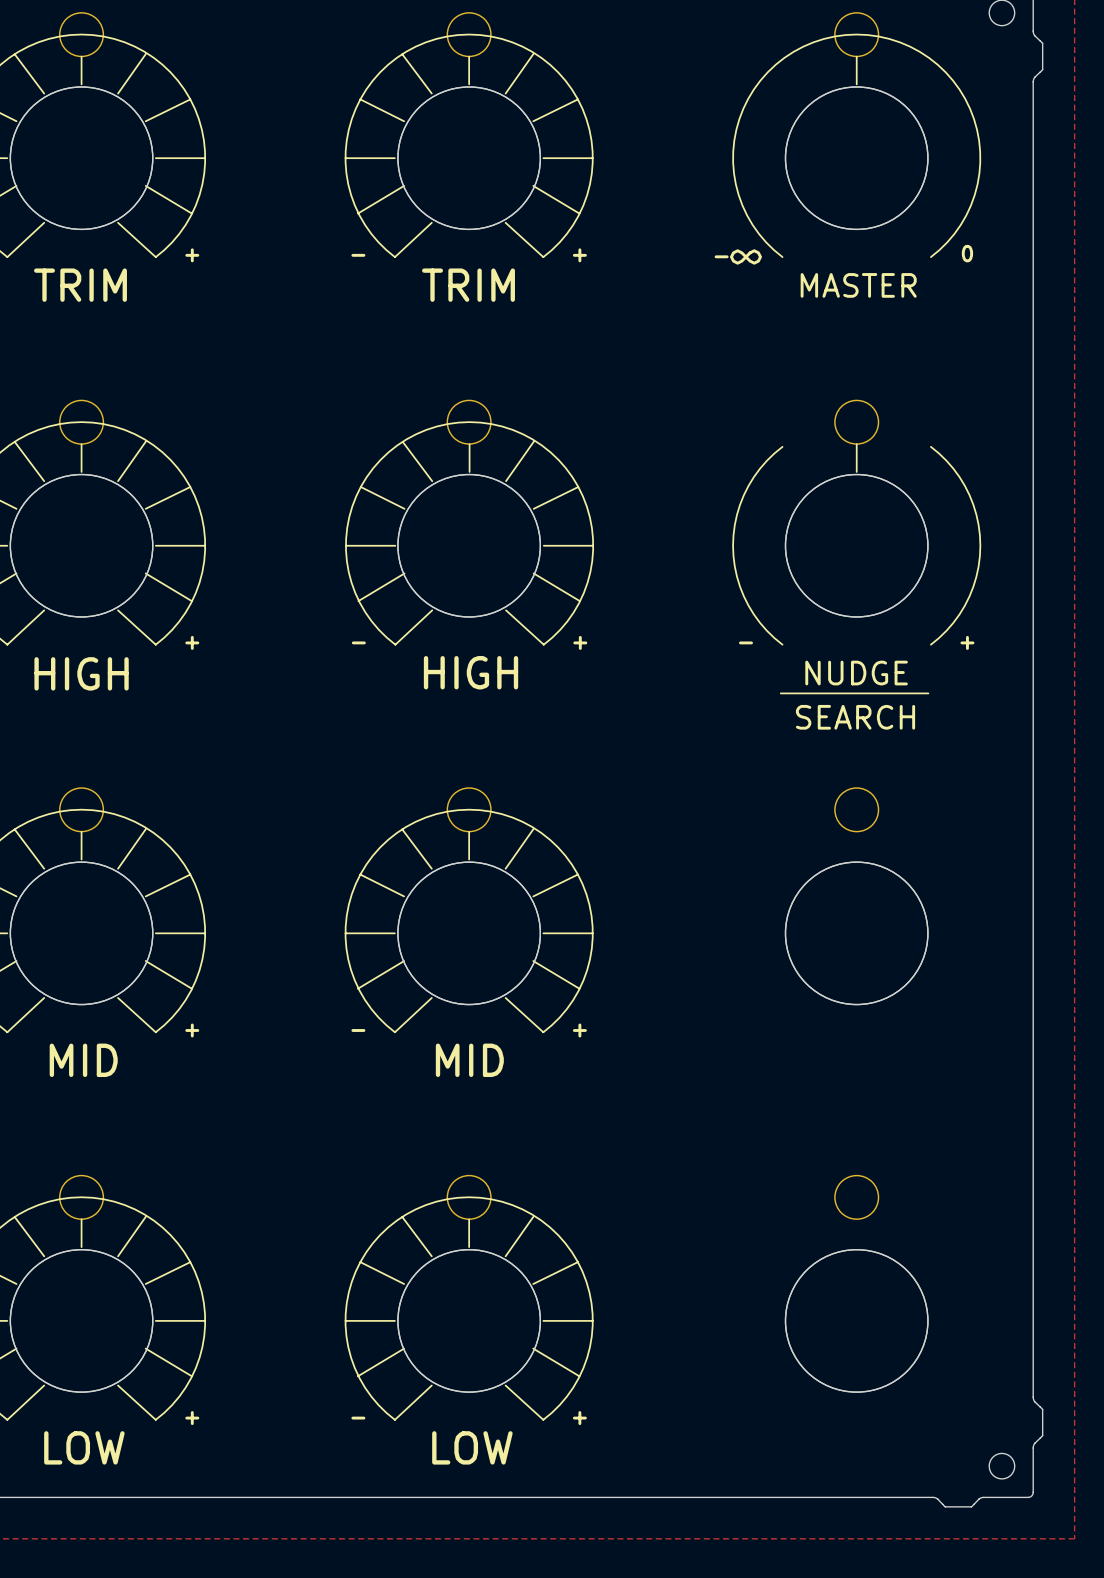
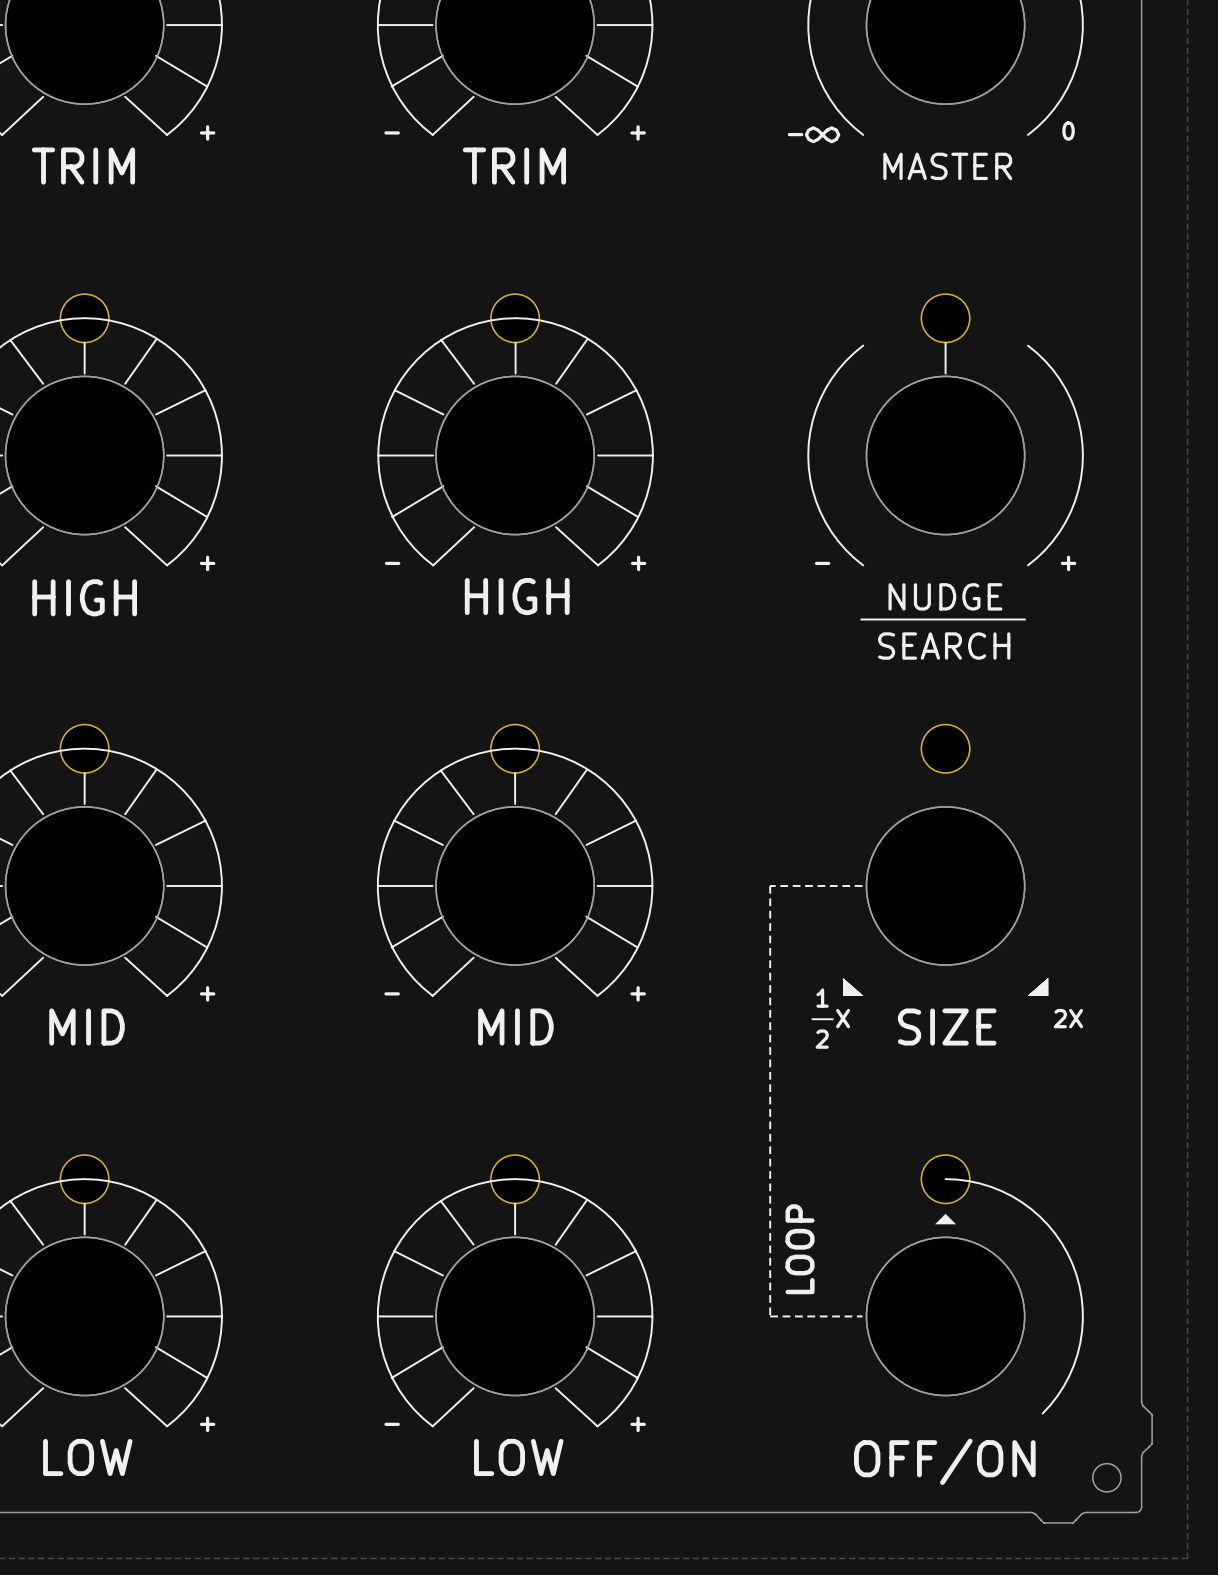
line: none -> (862, 885) (770, 885) (770, 1316) (862, 1316)
drawing: none -> [843, 978, 864, 996]
drawing: none -> [1027, 978, 1049, 996]
text: none -> 1 (822, 998)
text: none -> X (843, 1018)
text: none -> 2X (1068, 1018)
line: none -> (812, 1019) (832, 1019)
text: none -> SIZE (947, 1026)
text: none -> 2 (822, 1039)
line: none -> (945, 1179) (968, 1181) (990, 1186) (1021, 1202) (1047, 1224) (1061, 1243) (1072, 1263) (1081, 1297) (1082, 1320) (1080, 1343) (1069, 1376) (1057, 1395) (1042, 1413)
drawing: none -> [935, 1213, 956, 1225]
text: none -> LOOP (800, 1249)
text: none -> OFF/ON (944, 1461)

